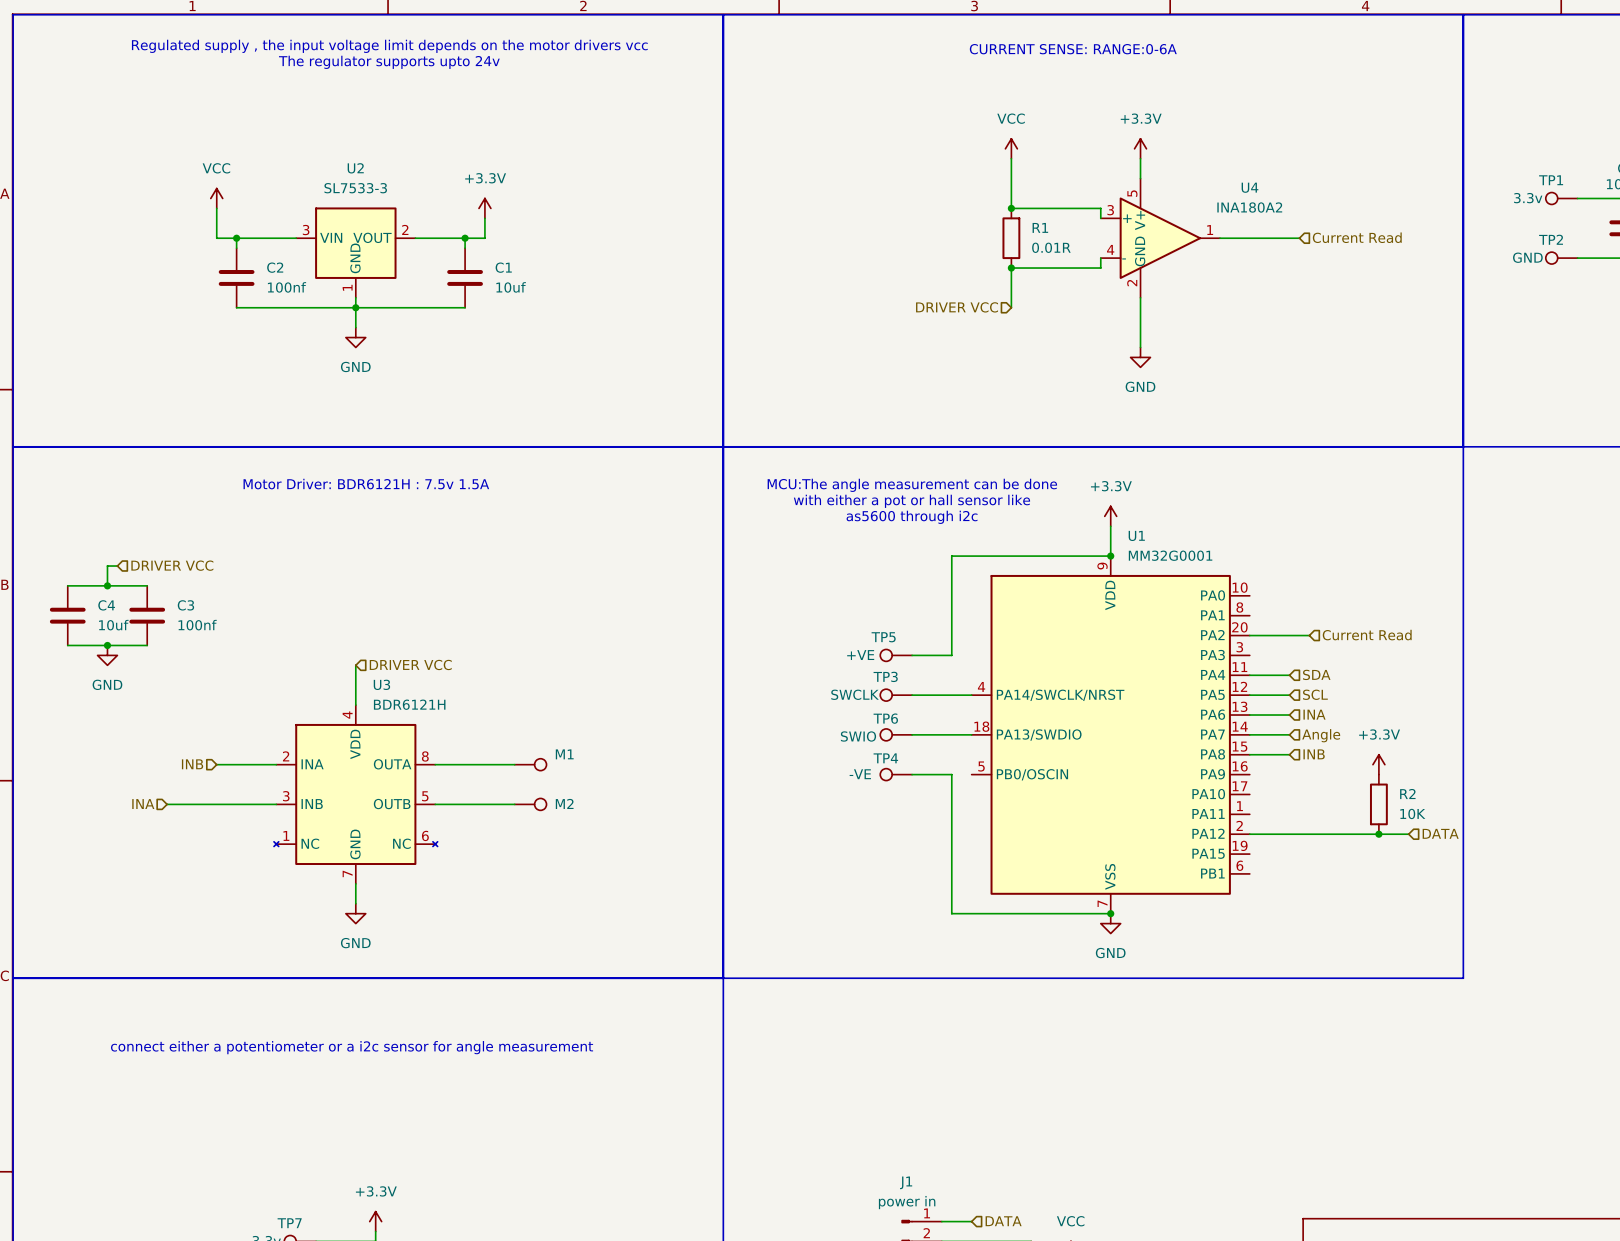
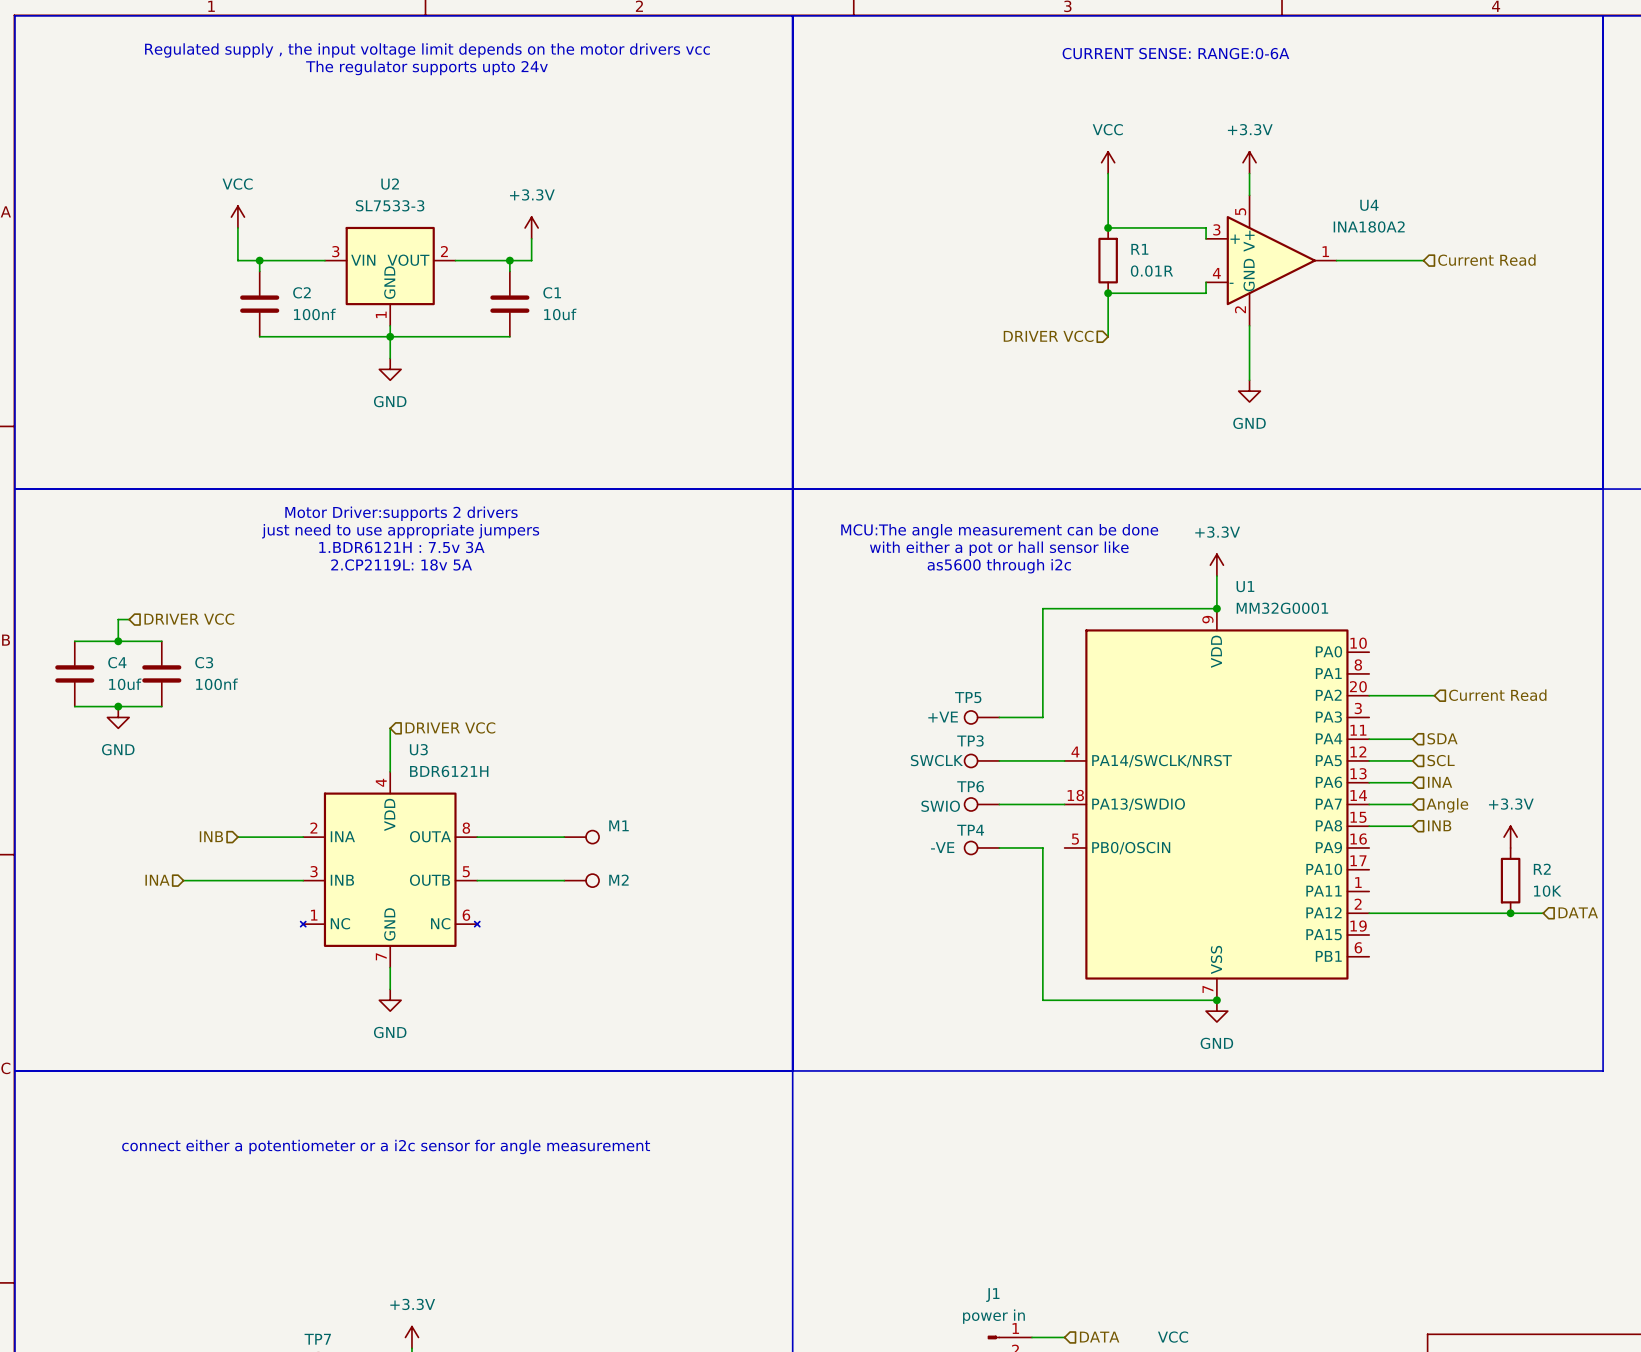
text: none -> Motor Driver:supports 2 drivers (401, 513)
text: Motor Driver: BDR6121H : 7.5v 1.5A (366, 484) -> just need to use appropriate jumpers (400, 531)
text: none -> 1.BDR6121H : 7.5v 3A (401, 547)
text: none -> 2.CP2119L: 18v 5A (401, 564)

